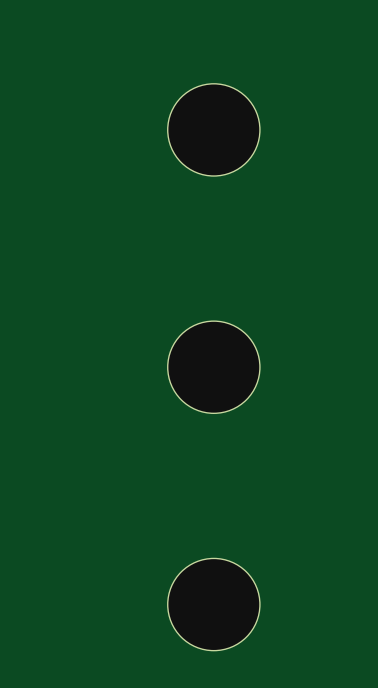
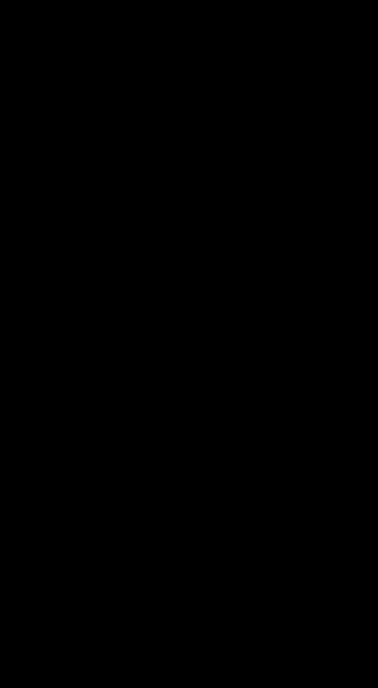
part: (213, 129) -> none
part: (213, 367) -> none
part: (213, 604) -> none

